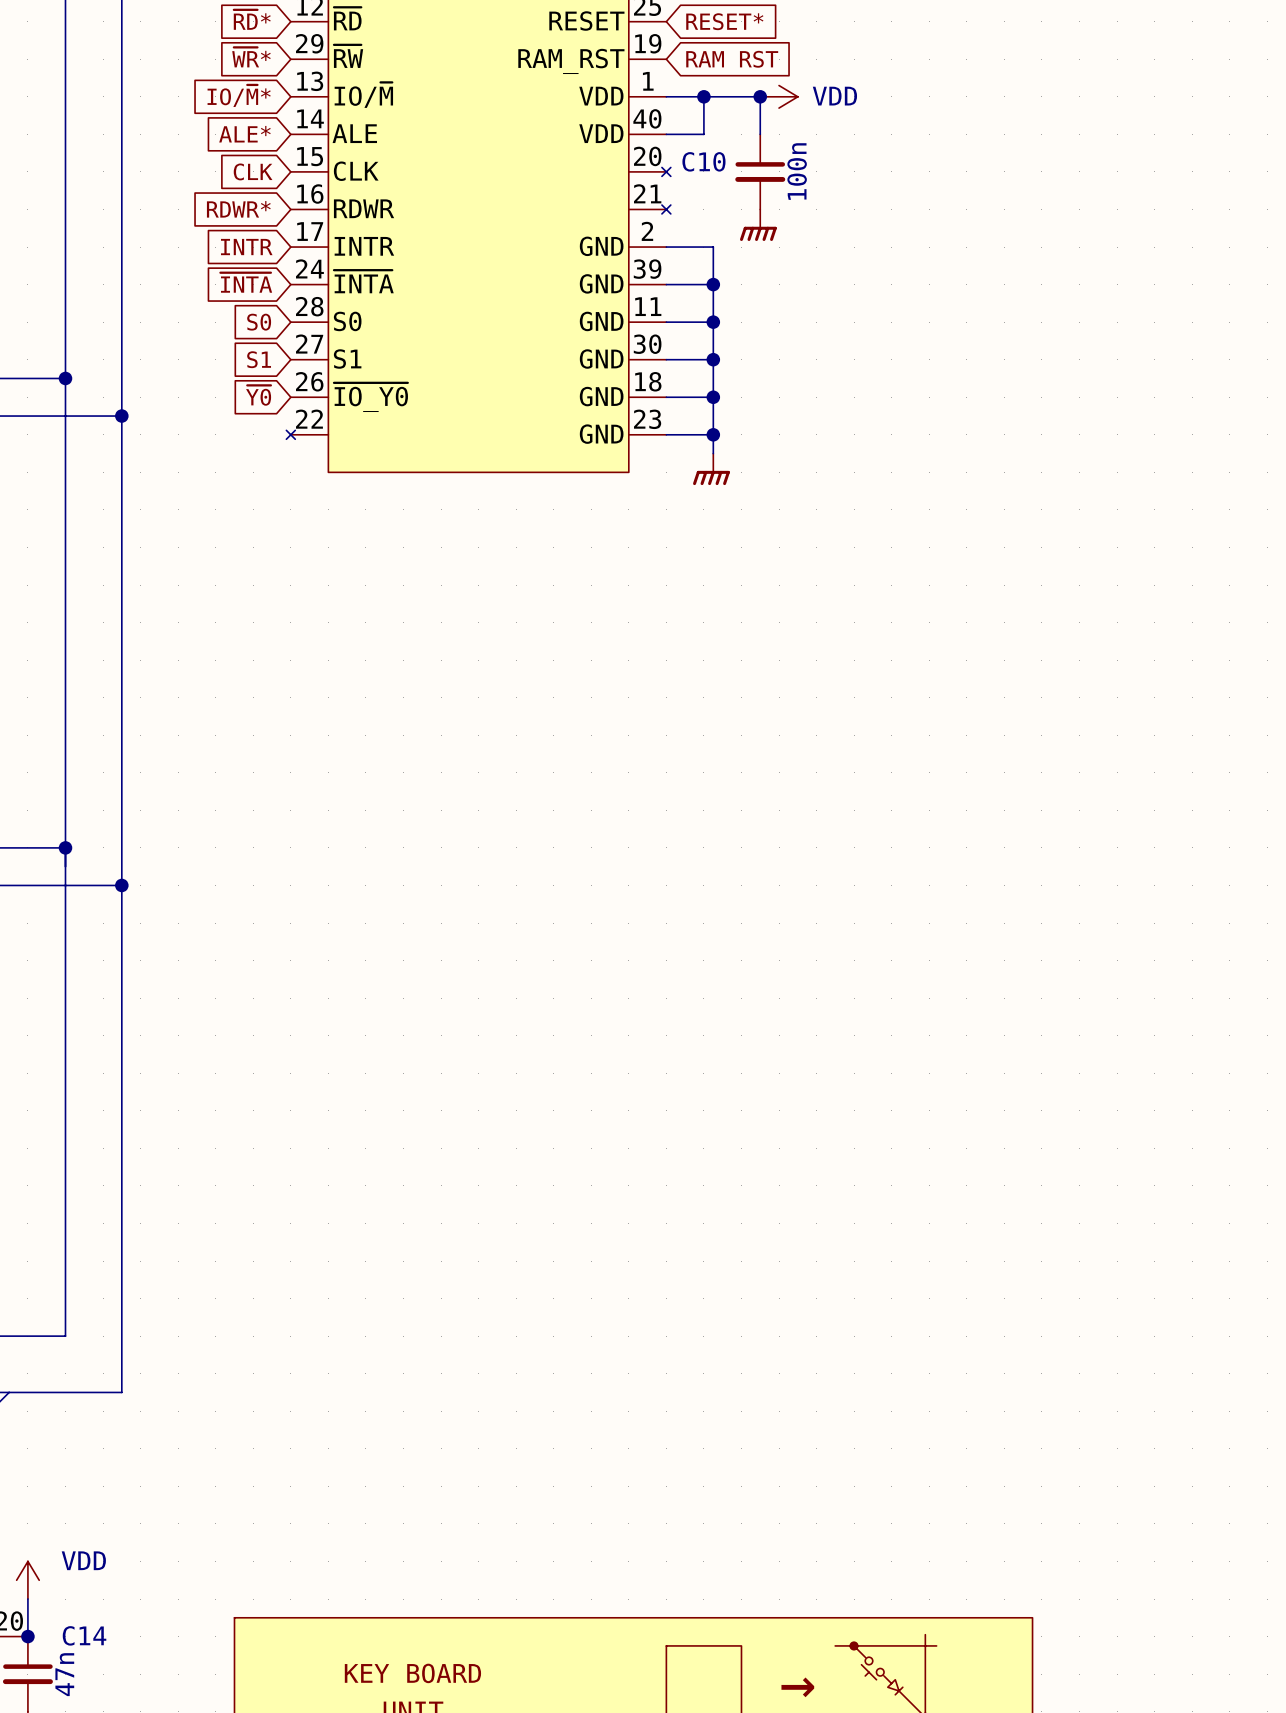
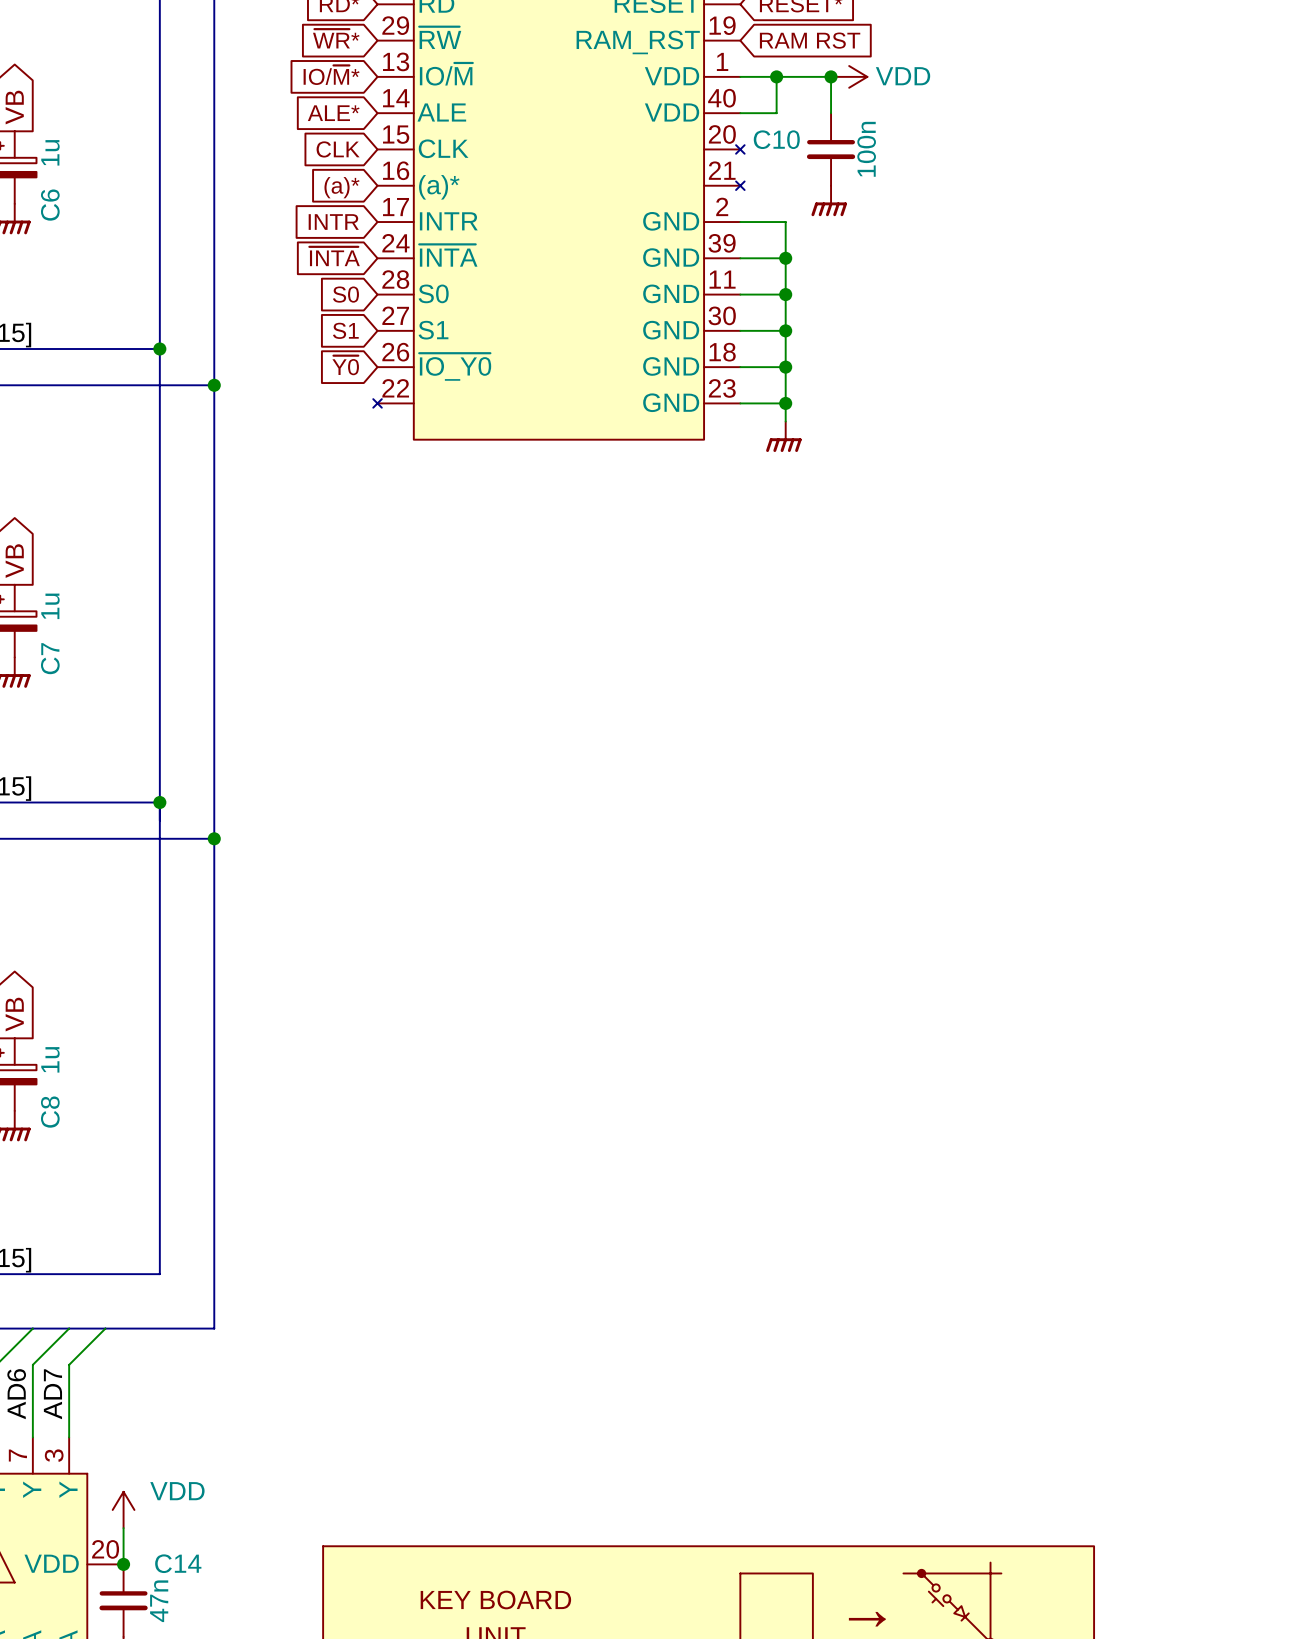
part pin name: RDWR (364, 208) -> (a)* (439, 187)
global label: RDWR* (238, 209) -> (a)* (341, 187)

